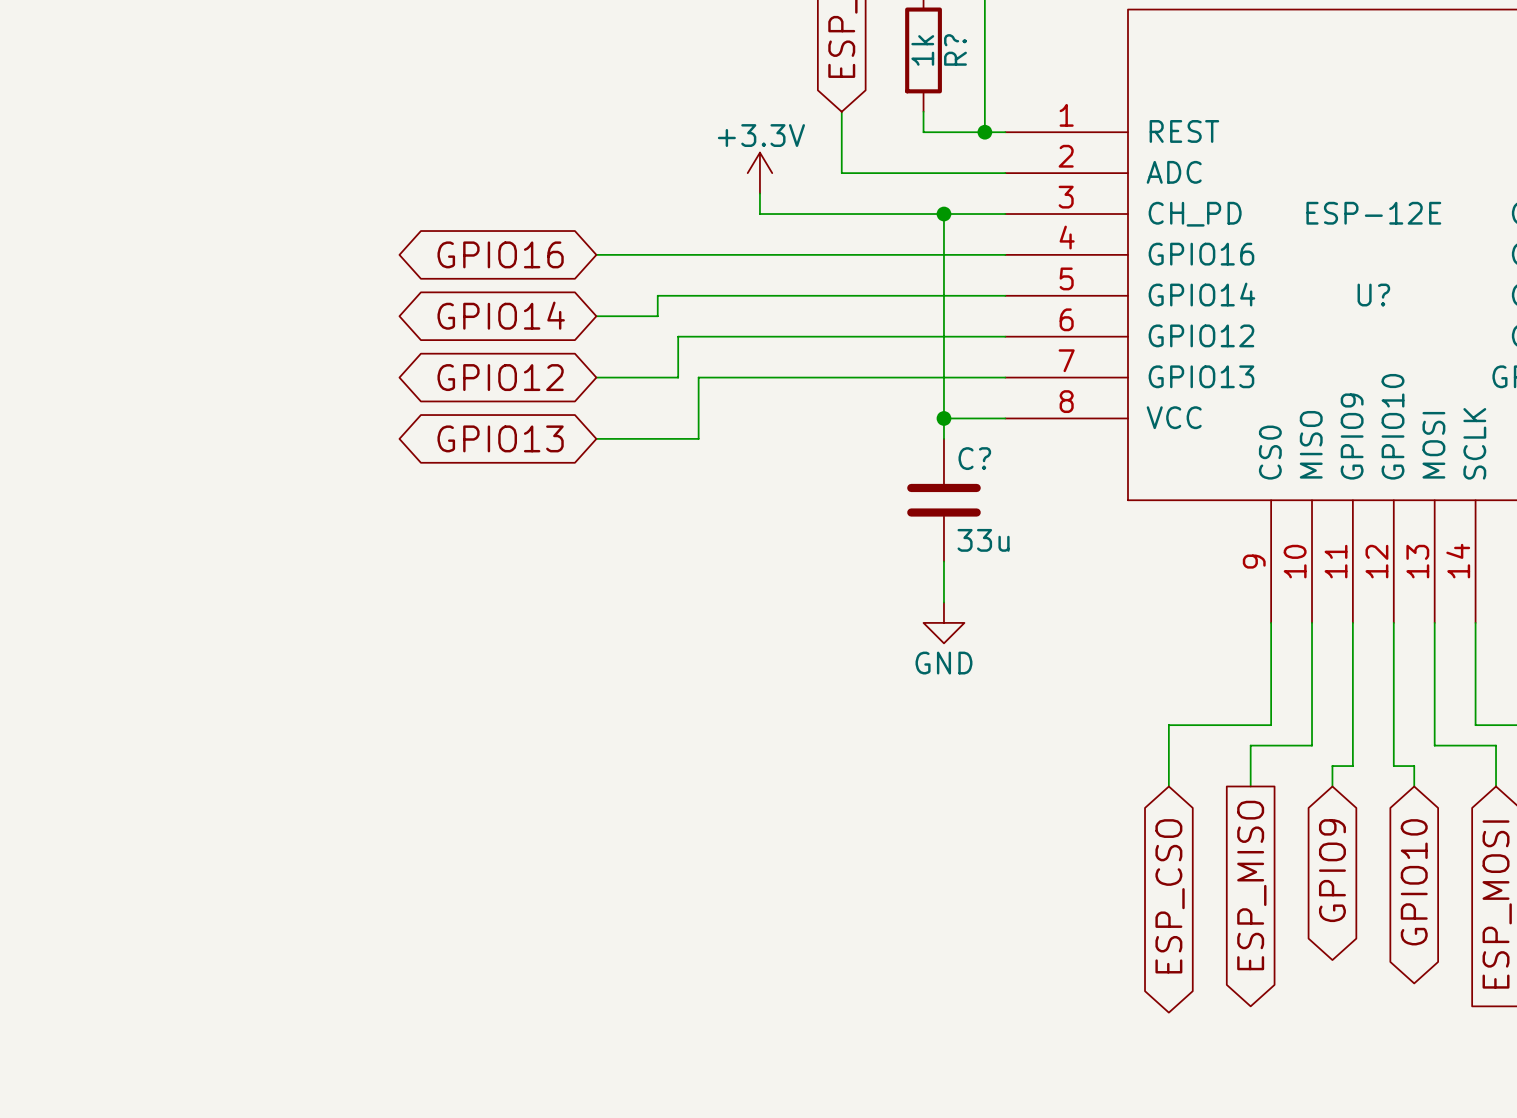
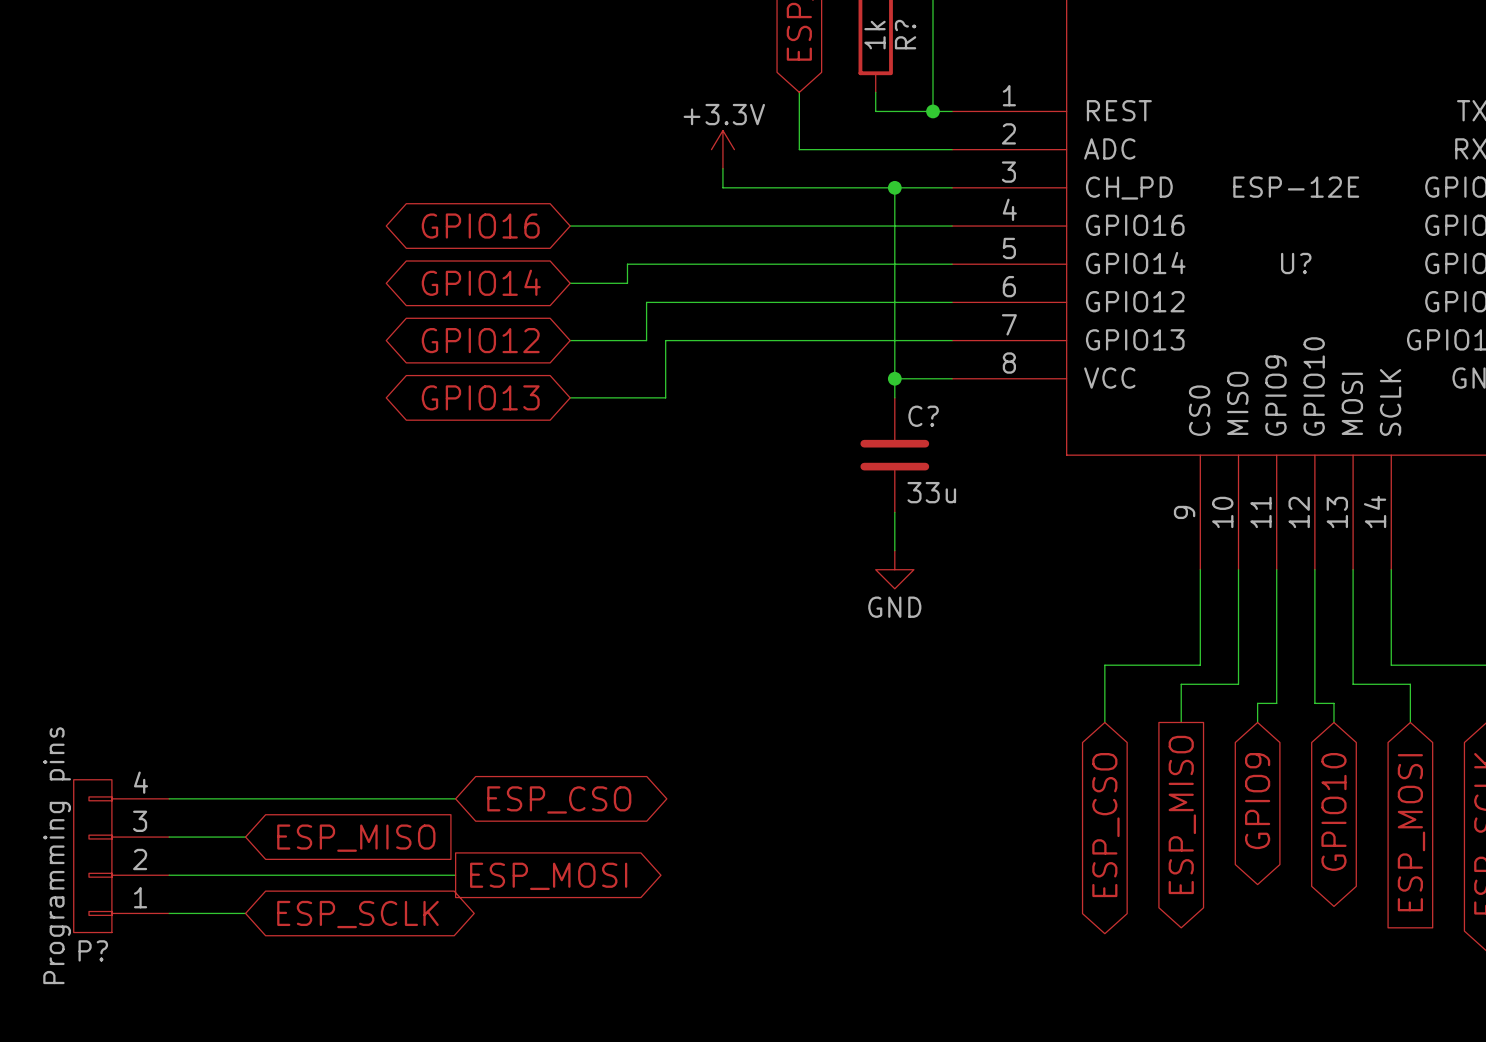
wire: none -> (169, 798) (455, 798)
global label: none -> ESP_CSO (559, 799)
wire: none -> (169, 837) (245, 837)
global label: none -> ESP_MISO (356, 838)
P?: none -> Programming pins (121, 856)
wire: none -> (169, 875) (455, 875)
global label: none -> ESP_MOSI (548, 876)
wire: none -> (169, 913) (245, 913)
global label: none -> ESP_SCLK (357, 914)

